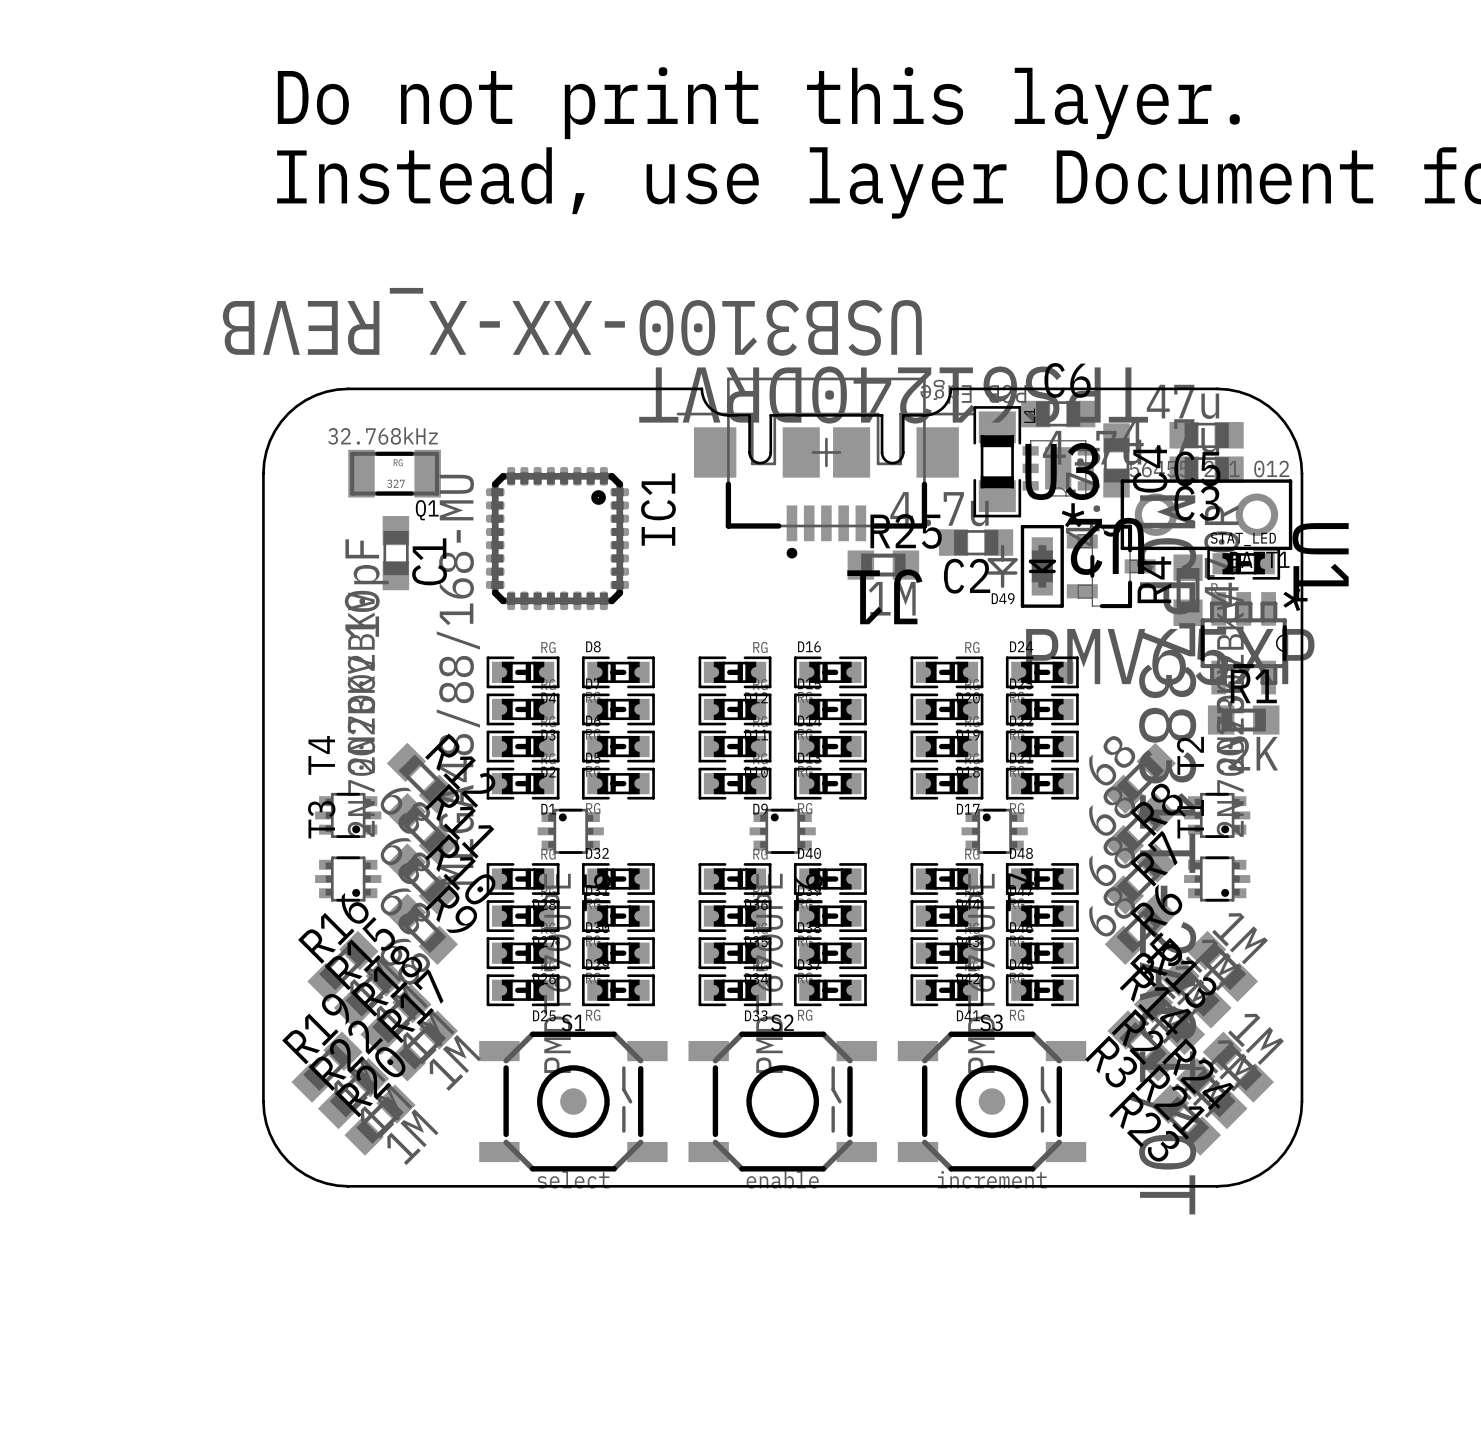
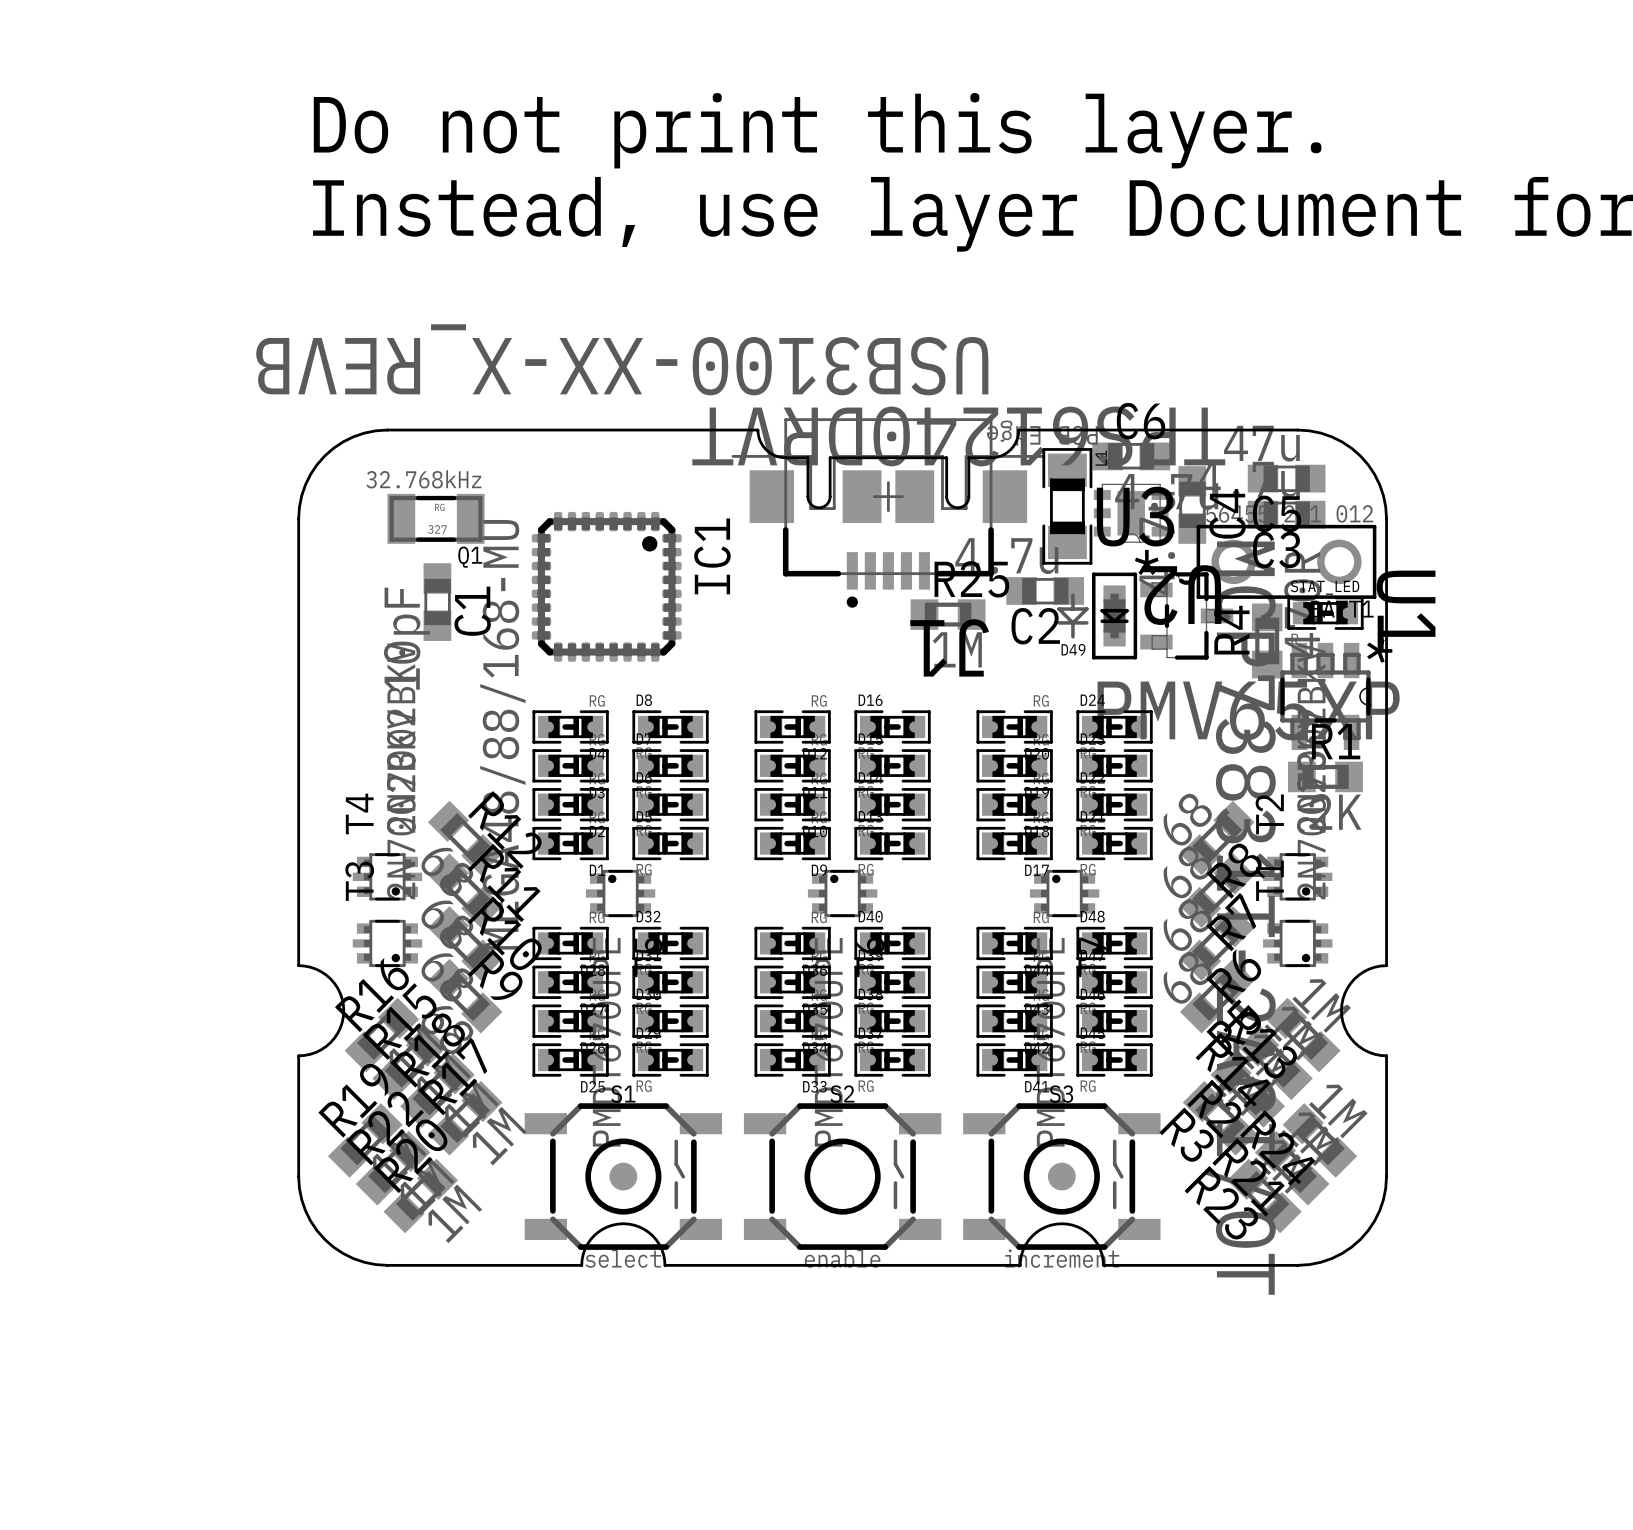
board edge: (263, 900) (263, 986) -> (298, 965) (315, 969) (330, 978) (340, 993) (343, 1010) (340, 1028) (330, 1042) (315, 1052) (298, 1055)
board edge: (1301, 900) (1301, 986) -> (1386, 965) (1369, 969) (1354, 978) (1344, 993) (1341, 1010) (1344, 1028) (1354, 1042) (1369, 1052) (1386, 1055)
board edge: (533, 1186) (613, 1186) -> (581, 1265) (584, 1249) (593, 1235) (607, 1226) (623, 1223) (639, 1226) (652, 1235) (661, 1249) (664, 1265)
board edge: (952, 1186) (1031, 1186) -> (1020, 1265) (1023, 1249) (1032, 1235) (1045, 1226) (1061, 1223) (1077, 1226) (1091, 1235) (1100, 1249) (1103, 1265)

